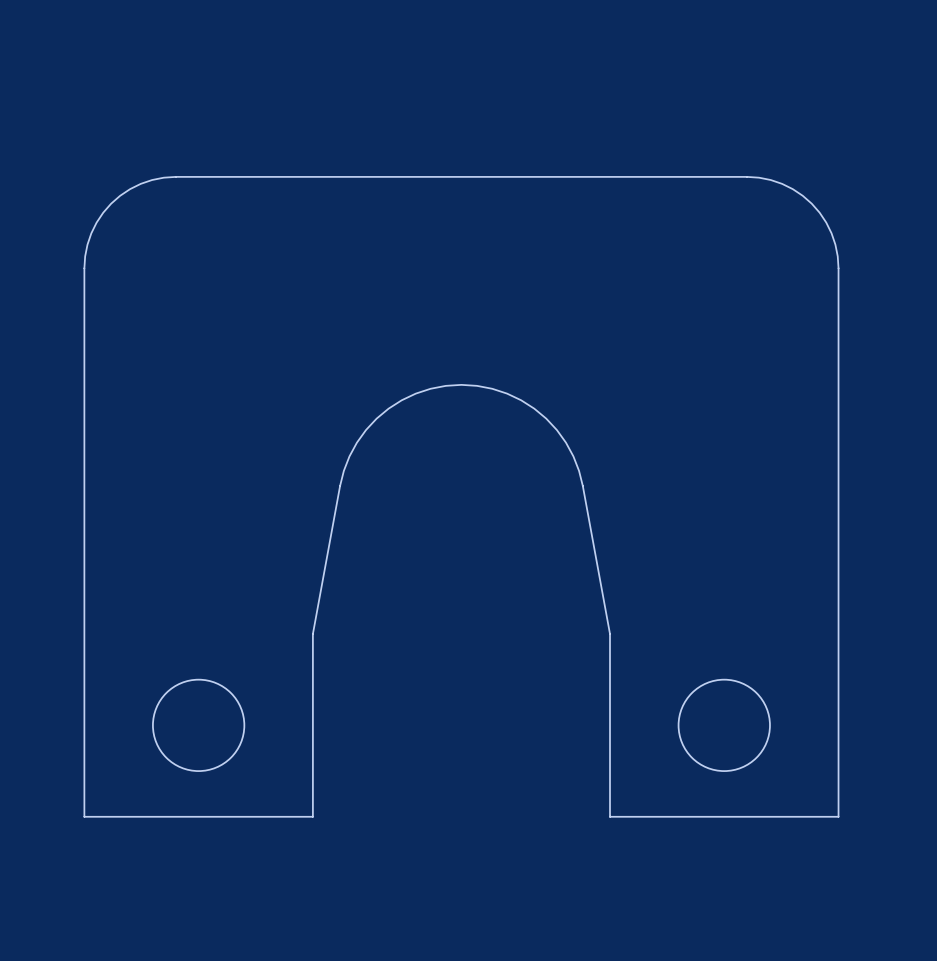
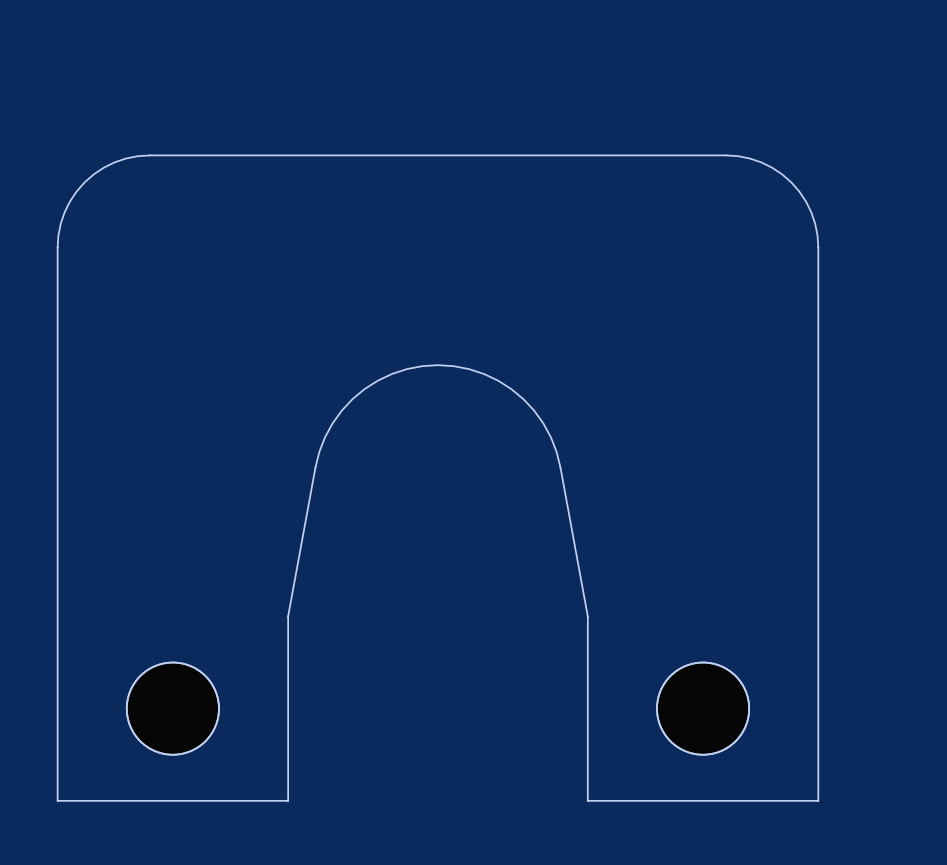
hole: none -> (172, 708)
hole: none -> (703, 708)

